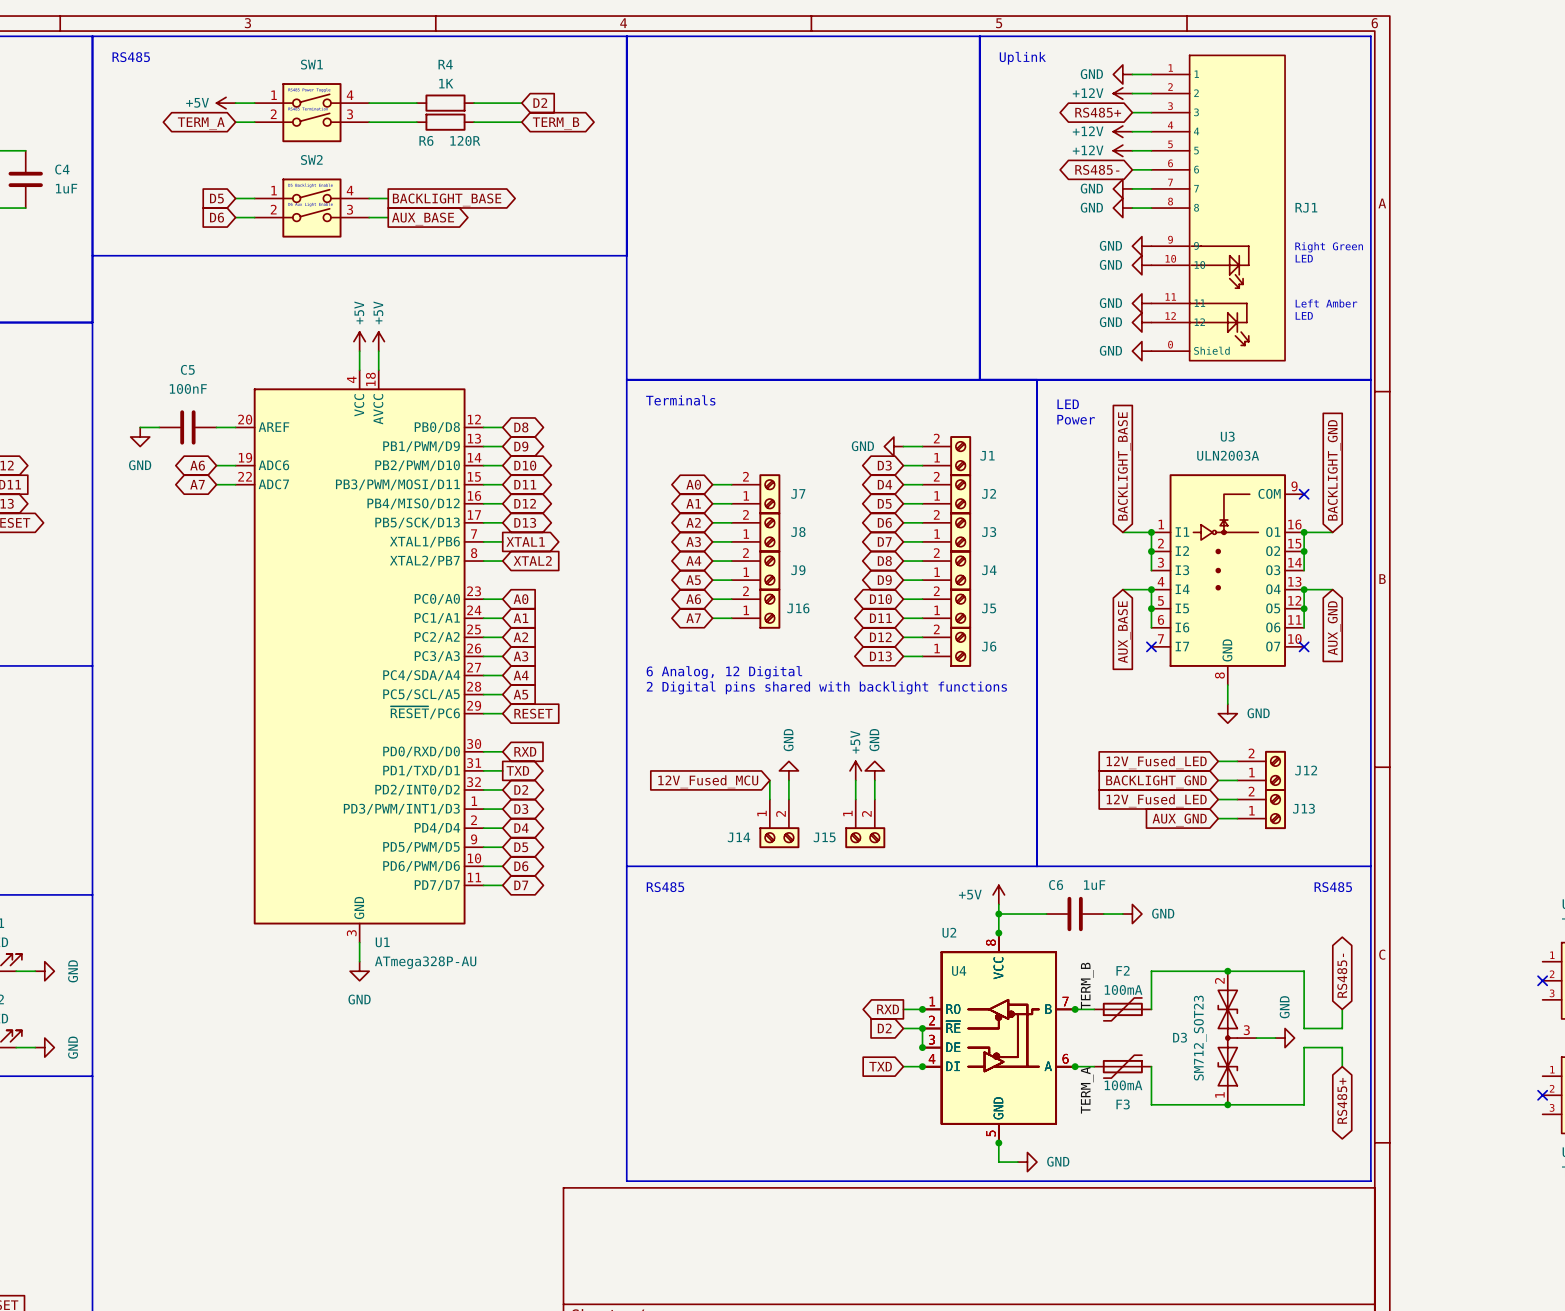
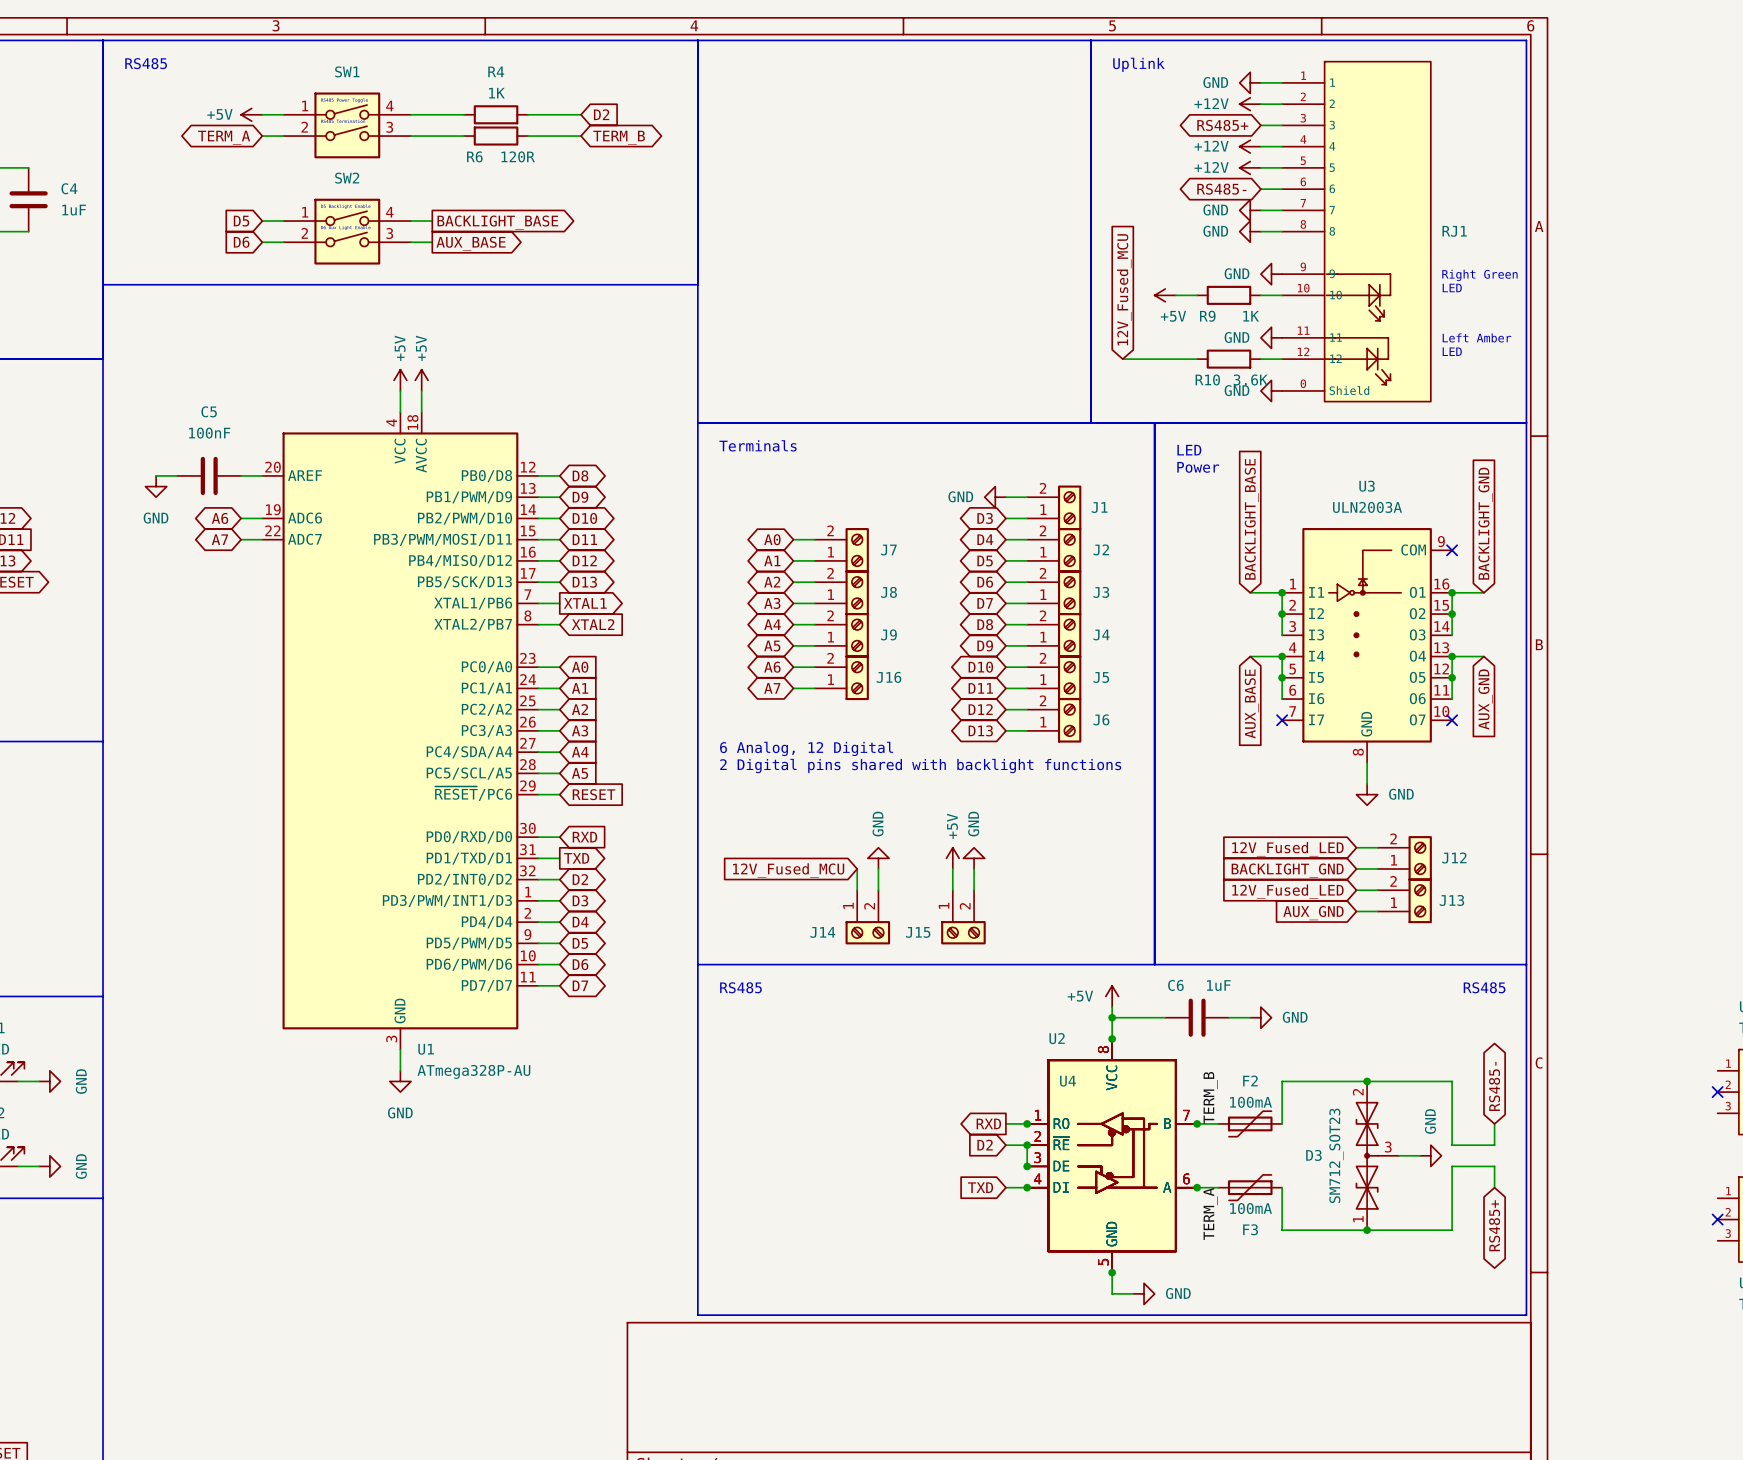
global label: none -> 12V_Fused_MCU (1124, 289)
power symbol: none -> +5V (1165, 295)
wire: none -> (1175, 295) (1197, 295)
R9: none -> 1K (1229, 295)
power symbol: GND (1141, 265) -> none
wire: none -> (1122, 359) (1197, 359)
R10: none -> 3.6K (1229, 359)
power symbol: GND (1141, 322) -> none

